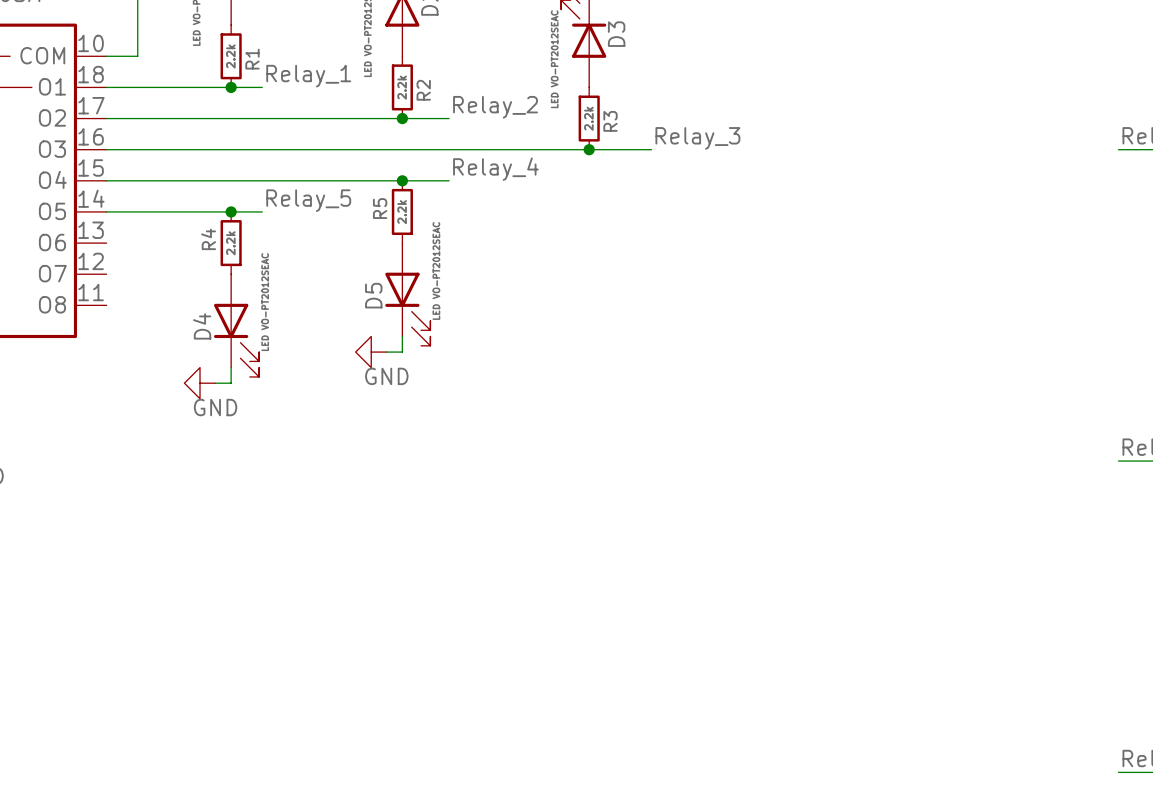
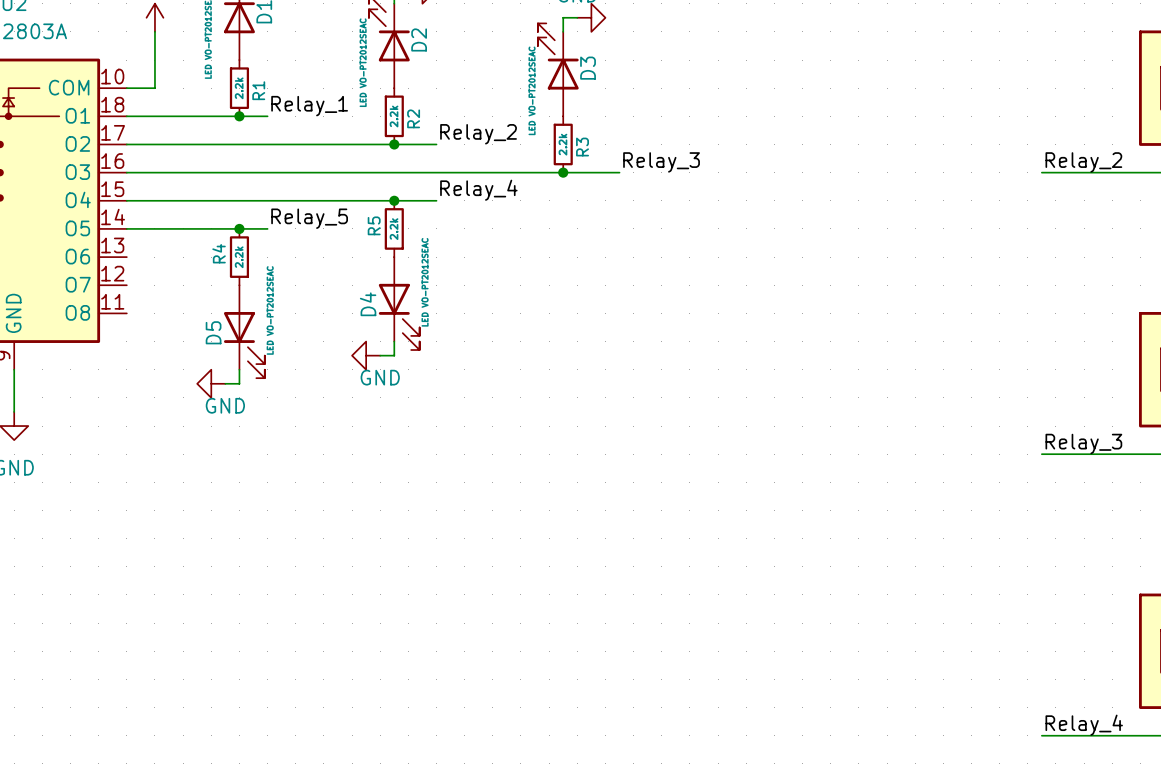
D5 name: D5 (373, 295) -> D4 (368, 304)
D4 name: D4 (202, 326) -> D5 (213, 332)

